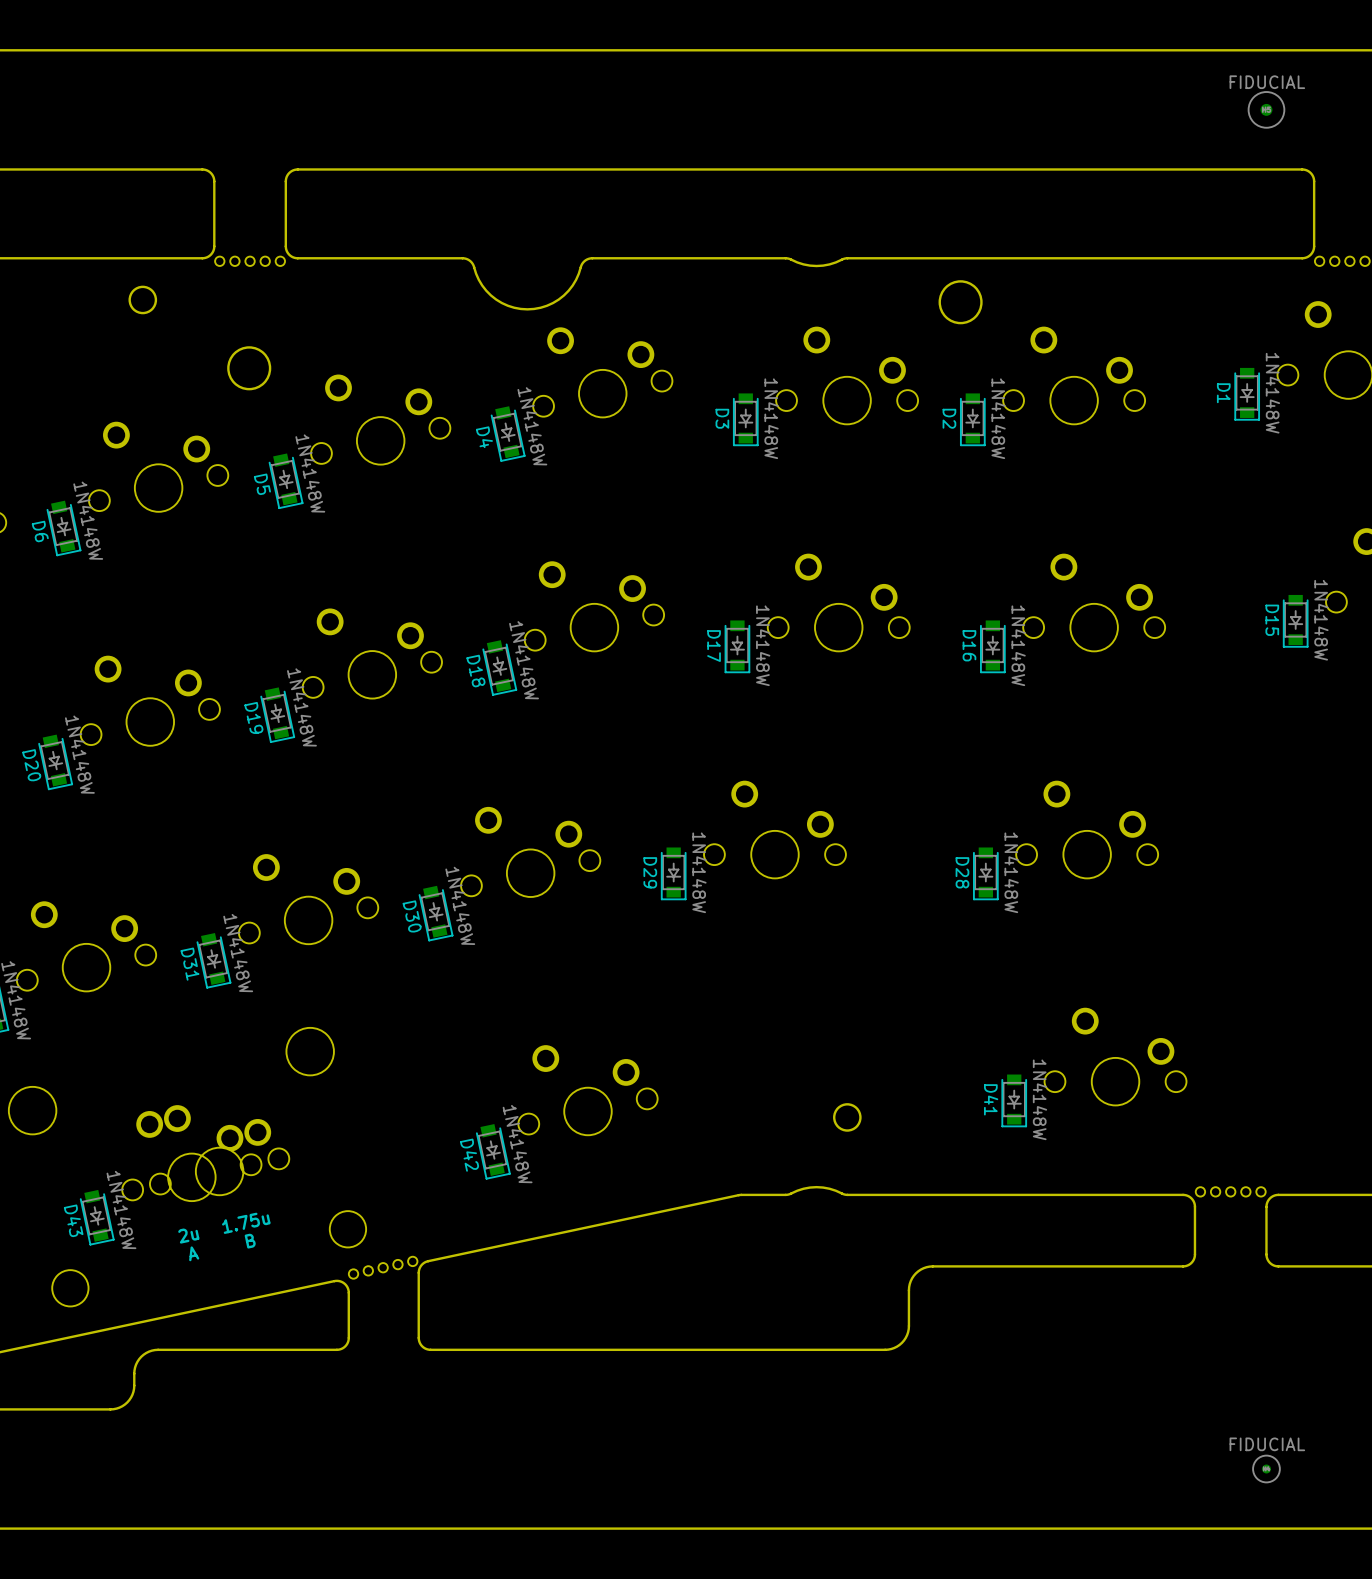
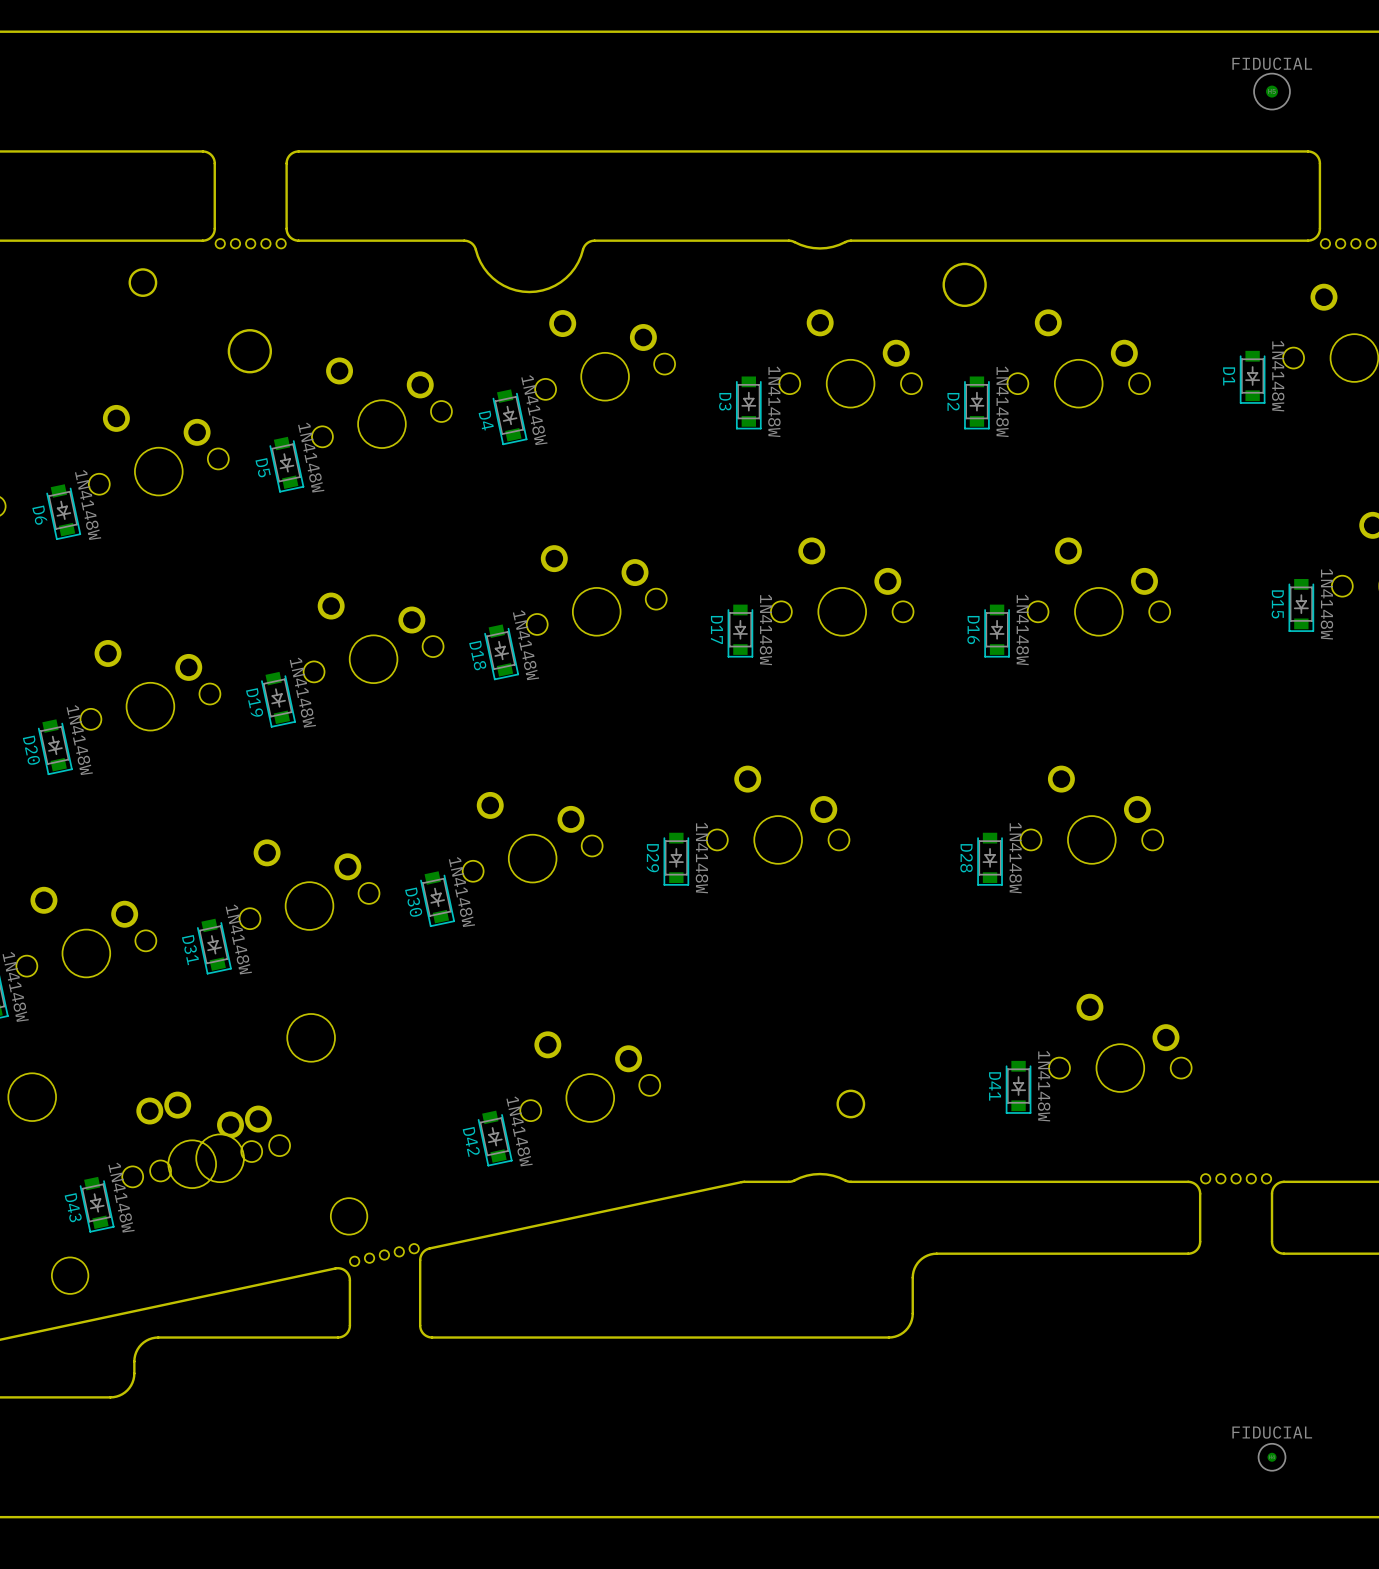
text: 1.75u (246, 1223) -> none
text: 2u (188, 1236) -> none
text: B (250, 1241) -> none
text: A (194, 1253) -> none

